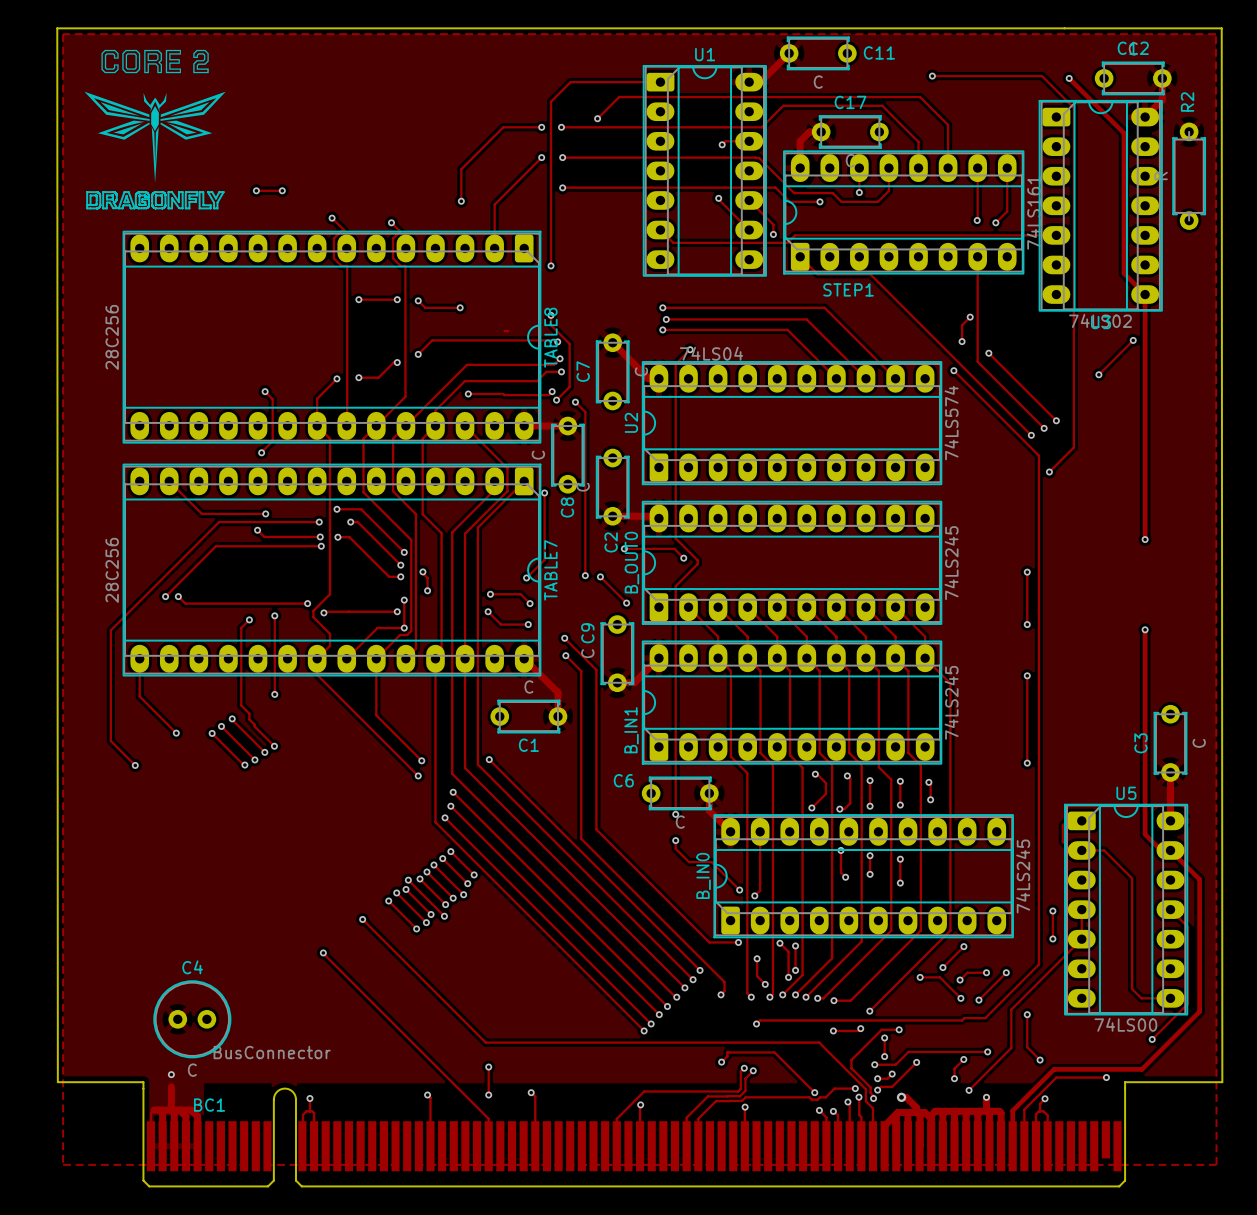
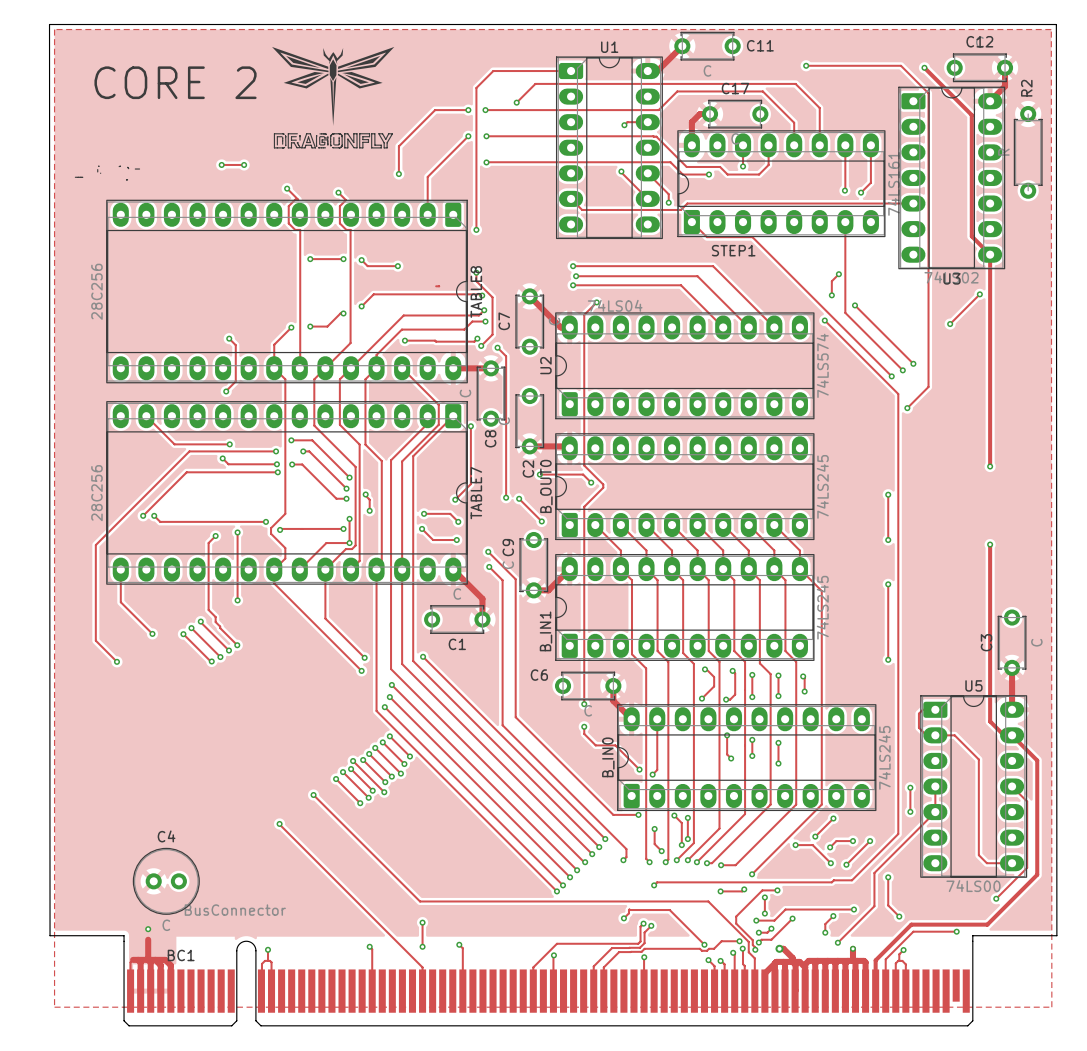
drawing: [101, 49, 209, 74] -> none
text: none -> CORE 2 (175, 82)
drawing position: (155, 102) -> (333, 56)
drawing position: (117, 106) -> (300, 59)
drawing position: (193, 106) -> (366, 59)
drawing position: (120, 109) -> (303, 61)
drawing position: (189, 109) -> (363, 61)
drawing position: (155, 118) -> (333, 70)
drawing position: (127, 128) -> (309, 79)
drawing position: (182, 128) -> (356, 79)
drawing position: (123, 130) -> (306, 80)
drawing position: (186, 130) -> (360, 80)
drawing position: (155, 154) -> (333, 101)
line: (98, 192) (87, 192) (87, 208) (98, 207) -> (284, 134) (274, 133) (274, 147) (284, 147)
line: (113, 192) (103, 192) (103, 208) (106, 208) (106, 202) (109, 202) (113, 208) (117, 208) (114, 202) -> (297, 133) (288, 133) (288, 147) (291, 147) (291, 142) (294, 142) (296, 147) (300, 147) (297, 142)
line: (124, 192) (128, 192) (134, 208) (130, 208) (129, 205) (123, 205) (122, 208) (118, 208) (124, 192) -> (306, 133) (310, 133) (315, 147) (311, 147) (311, 145) (301, 147) (306, 133)
line: (139, 192) (145, 192) -> (319, 133) (324, 133)
line: (162, 192) (153, 192) -> (339, 133) (332, 134)
line: (168, 192) (168, 208) (172, 208) (172, 198) (179, 208) (182, 208) (182, 192) (178, 192) (178, 202) (172, 192) (168, 192) -> (344, 133) (344, 147) (347, 147) (347, 139) (353, 147) (357, 147) (357, 133) (353, 133) (353, 142) (347, 133) (344, 133)
line: (185, 192) (185, 208) (189, 208) (189, 201) (195, 201) (195, 198) (189, 198) (189, 195) (197, 195) (197, 192) (185, 192) -> (359, 133) (359, 147) (362, 147) (362, 142) (368, 142) (368, 139) (362, 139) (362, 136) (369, 136) (369, 133) (359, 133)
line: (199, 192) (203, 192) (203, 205) (210, 205) (210, 208) (199, 208) (199, 192) -> (371, 133) (374, 133) (374, 145) (381, 145) (381, 147) (371, 147) (371, 133)
line: (207, 192) (212, 192) (215, 198) (219, 192) (223, 192) (217, 202) (217, 208) (214, 208) (214, 202) (207, 192) -> (378, 133) (382, 133) (385, 139) (388, 133) (392, 133) (387, 142) (387, 147) (384, 147) (384, 142) (378, 133)
line: (99, 194) (100, 204) -> (285, 135) (285, 144)
line: (116, 194) (116, 199) -> (299, 135) (300, 140)
line: (136, 194) (135, 205) -> (316, 135) (316, 145)
line: (165, 194) (165, 205) -> (341, 135) (342, 145)
line: (95, 195) (90, 195) (90, 205) -> (281, 136) (277, 136) (277, 144)
line: (112, 195) (106, 195) (106, 199) (112, 199) -> (296, 136) (291, 136) (291, 140) (296, 140)
line: (126, 195) (124, 202) (128, 202) (126, 195) -> (308, 136) (306, 142) (310, 142) (308, 136)
line: (140, 195) (144, 195) -> (320, 136) (324, 136)
line: (148, 195) (149, 197) (145, 196) -> (327, 136) (327, 138) (324, 137)
line: (152, 195) (152, 206) -> (330, 136) (330, 145)
line: (96, 196) (96, 204) -> (282, 137) (282, 144)
line: (139, 196) (139, 204) -> (319, 137) (319, 144)
line: (155, 196) (155, 204) -> (333, 137) (333, 144)
line: (162, 196) (162, 204) -> (339, 137) (339, 144)
line: (145, 204) (142, 199) (148, 199) (148, 205) -> (324, 144) (322, 139) (327, 139) (327, 145)
line: (100, 205) (100, 205) -> (285, 145) (285, 145)
line: (140, 205) (144, 205) -> (320, 144) (324, 144)
line: (156, 205) (161, 205) -> (334, 144) (338, 144)
line: (165, 205) (165, 206) -> (342, 145) (341, 146)
line: (135, 206) (136, 206) -> (316, 145) (316, 146)
line: (154, 207) (155, 208) -> (332, 147) (333, 147)
line: (138, 208) (146, 208) -> (318, 147) (325, 147)
line: (163, 208) (155, 208) -> (340, 147) (333, 147)

